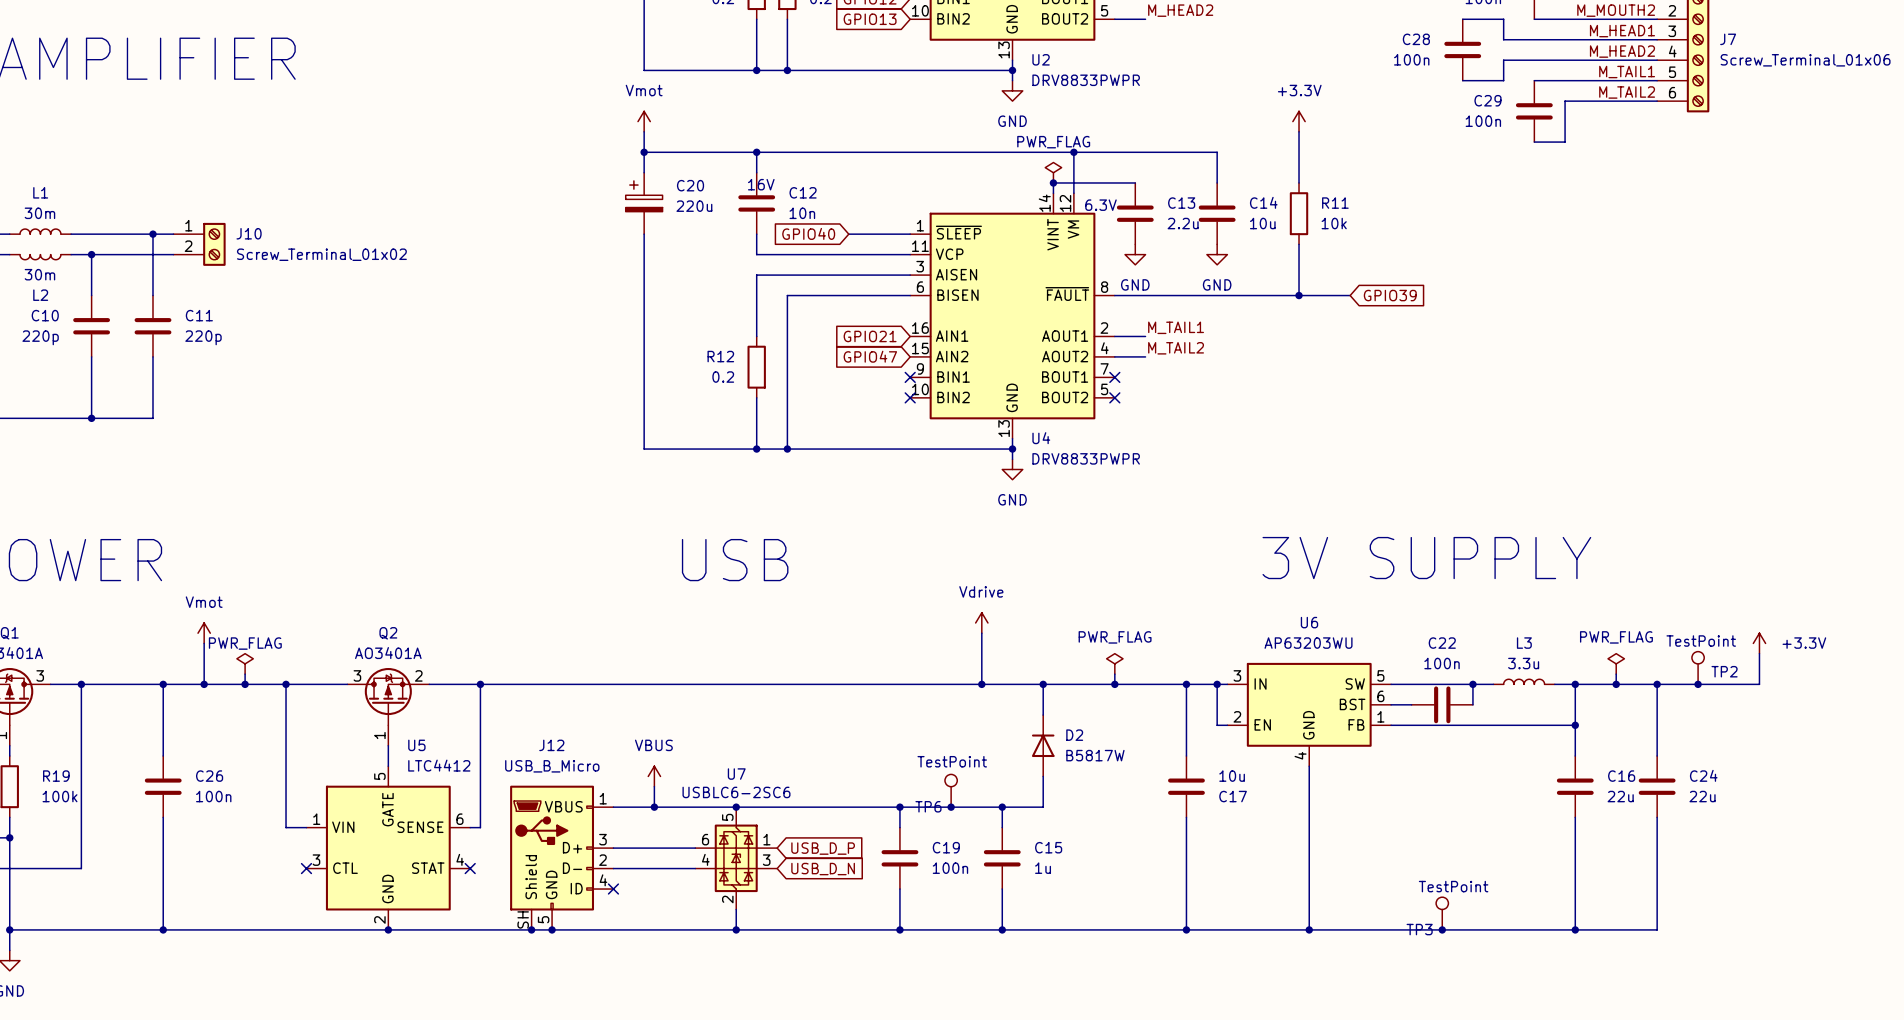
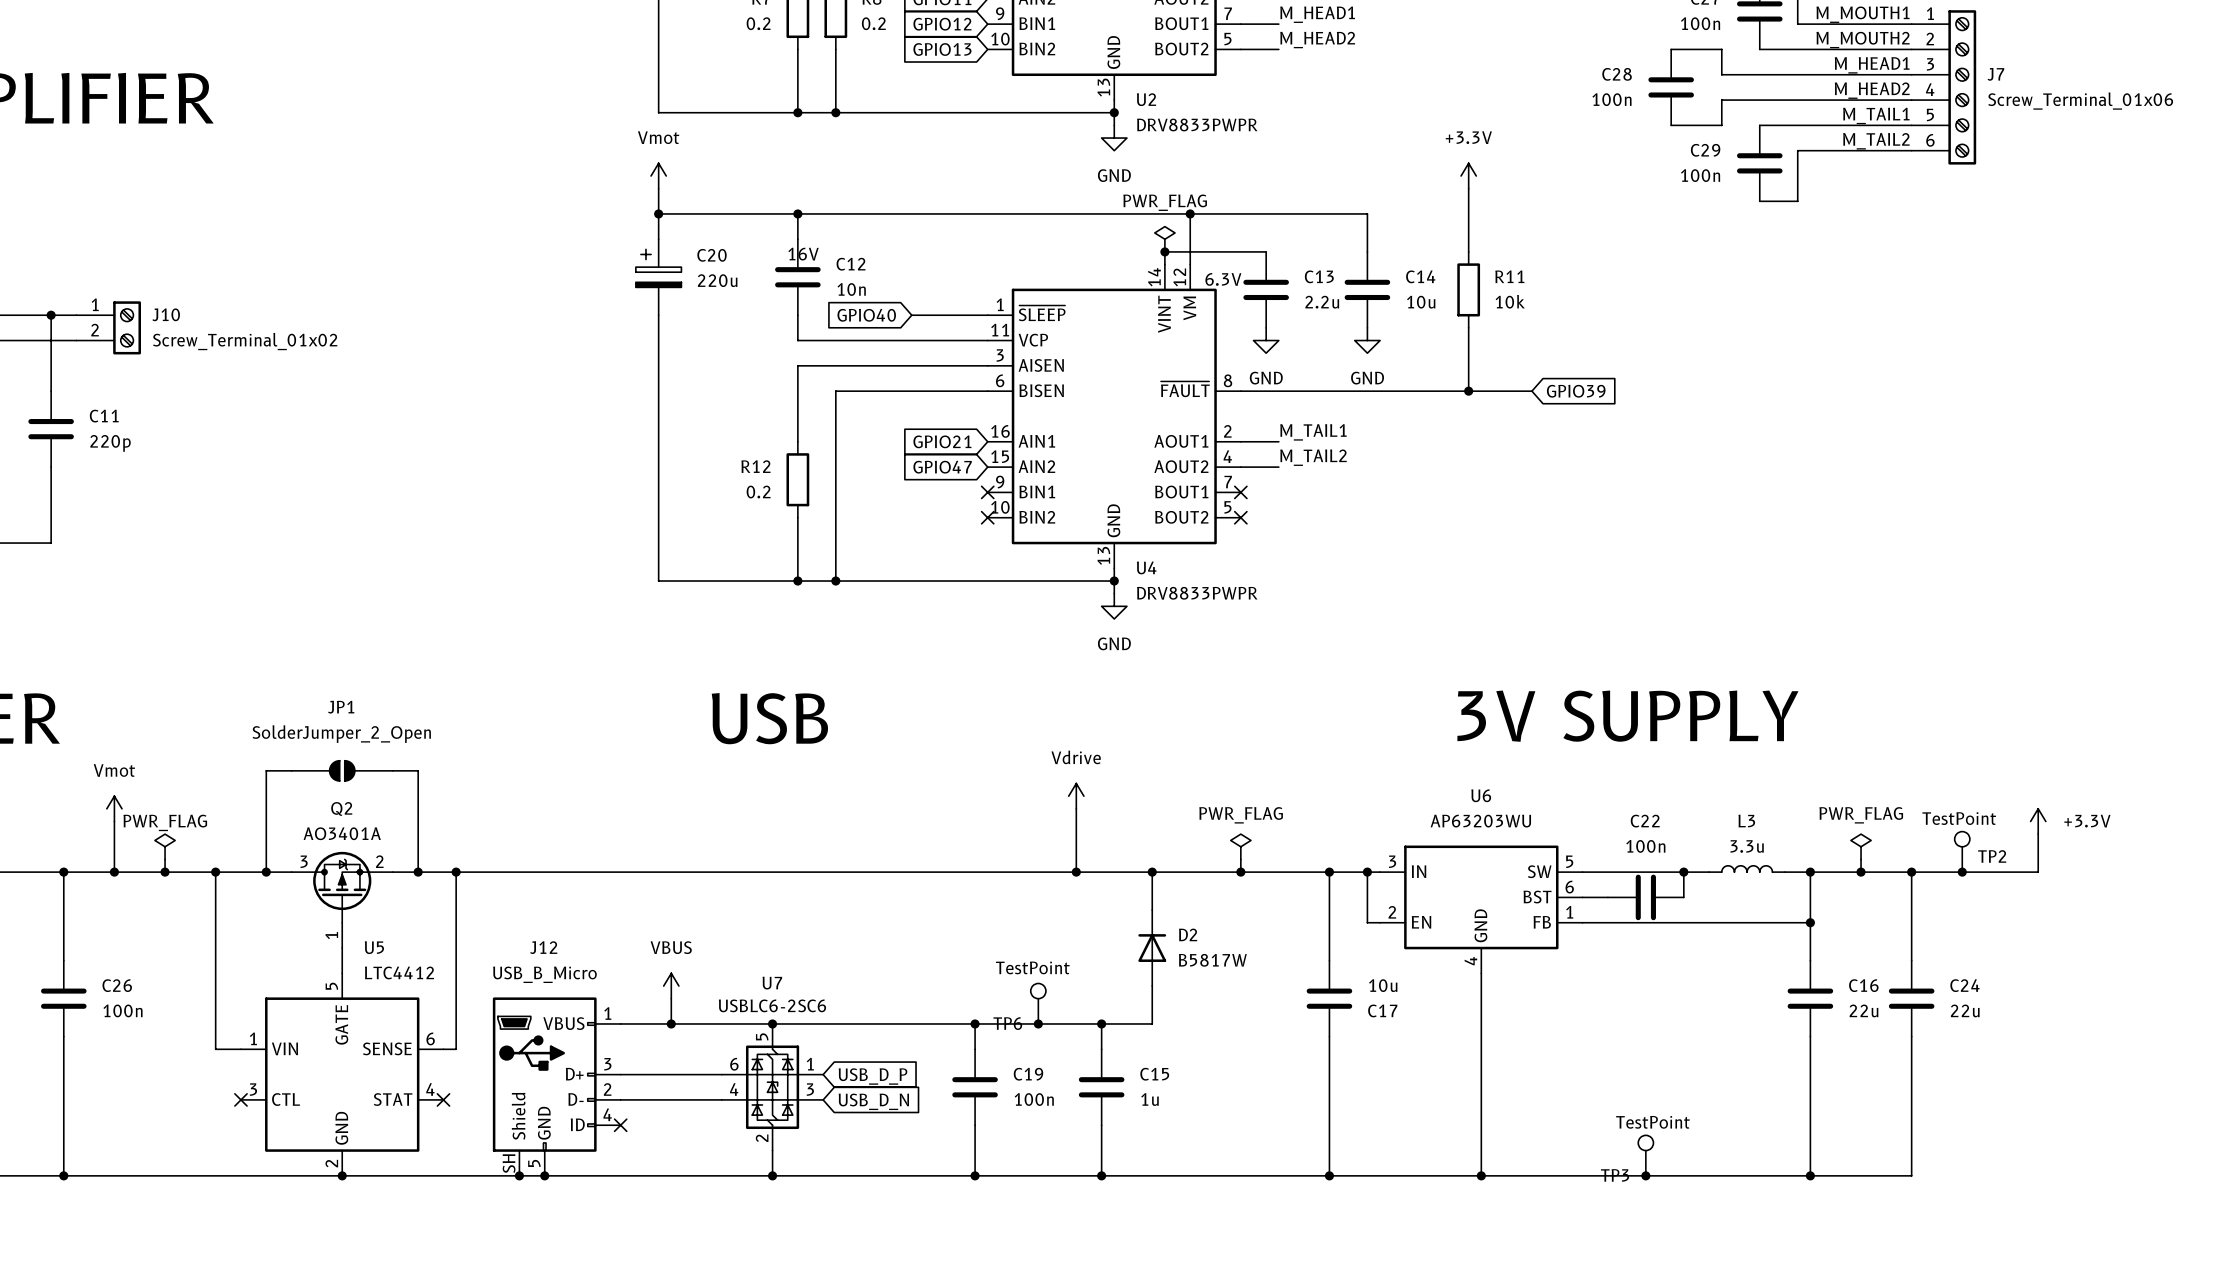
wire: none -> (291, 770) (266, 770) (266, 872)
JP1: none -> SolderJumper_2_Open (342, 770)
wire: none -> (392, 770) (418, 770) (418, 872)
junction: none -> (266, 872)
junction: none -> (418, 872)

